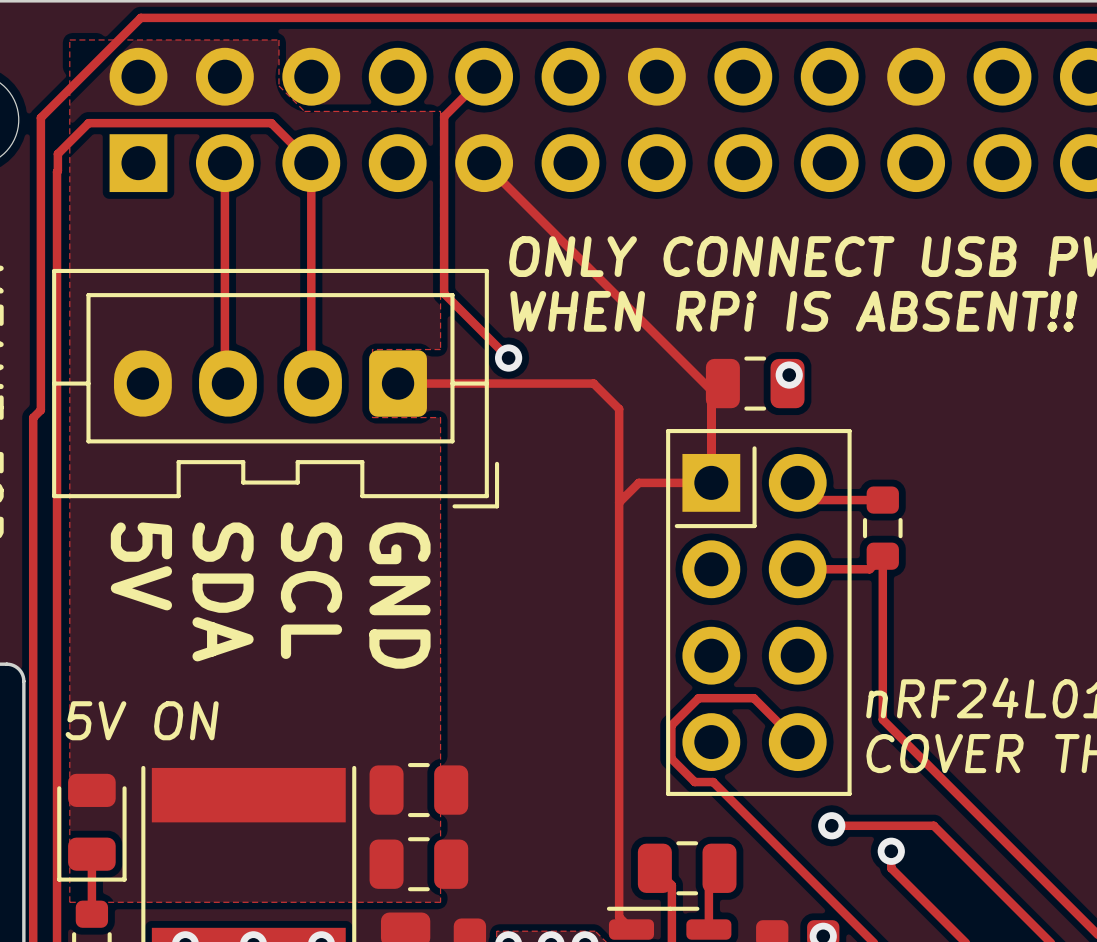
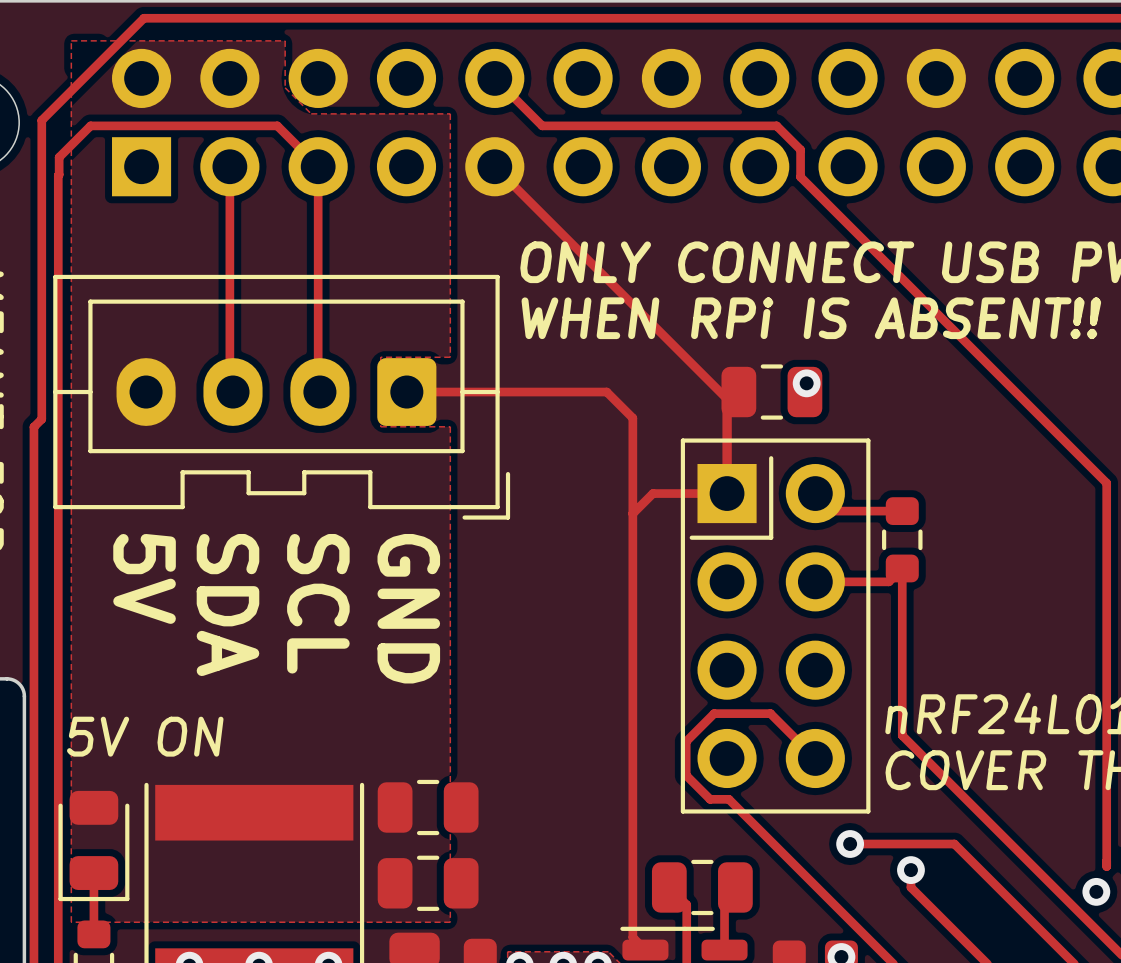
track: (484, 76) (444, 116) (444, 293) (508, 358) -> (494, 78) (542, 125) (776, 125) (800, 149) (800, 177) (1106, 483) (1106, 866)
via: (508, 358) -> none
via: none -> (1096, 891)

